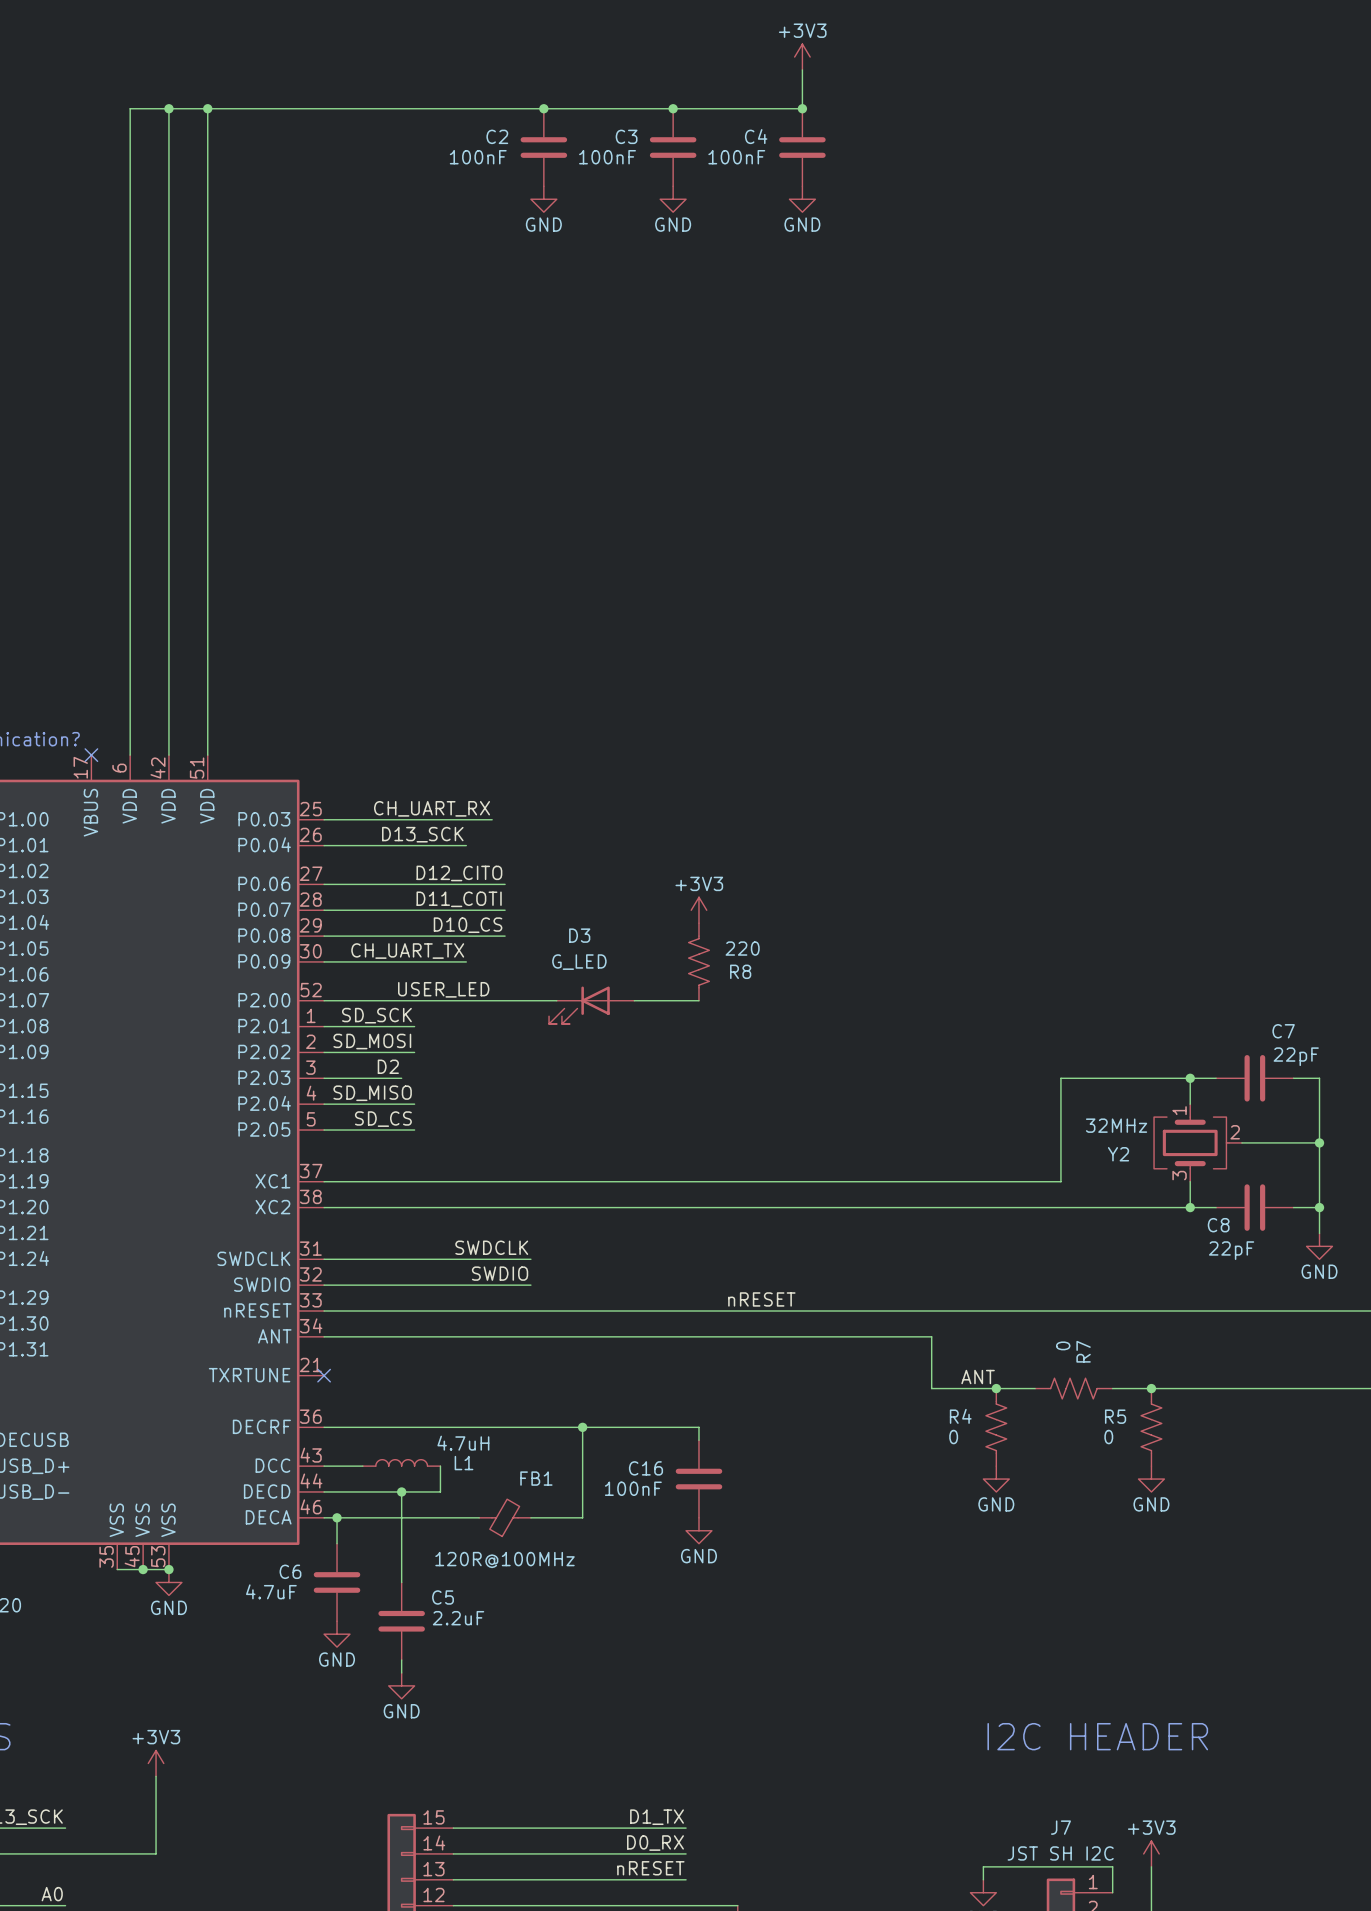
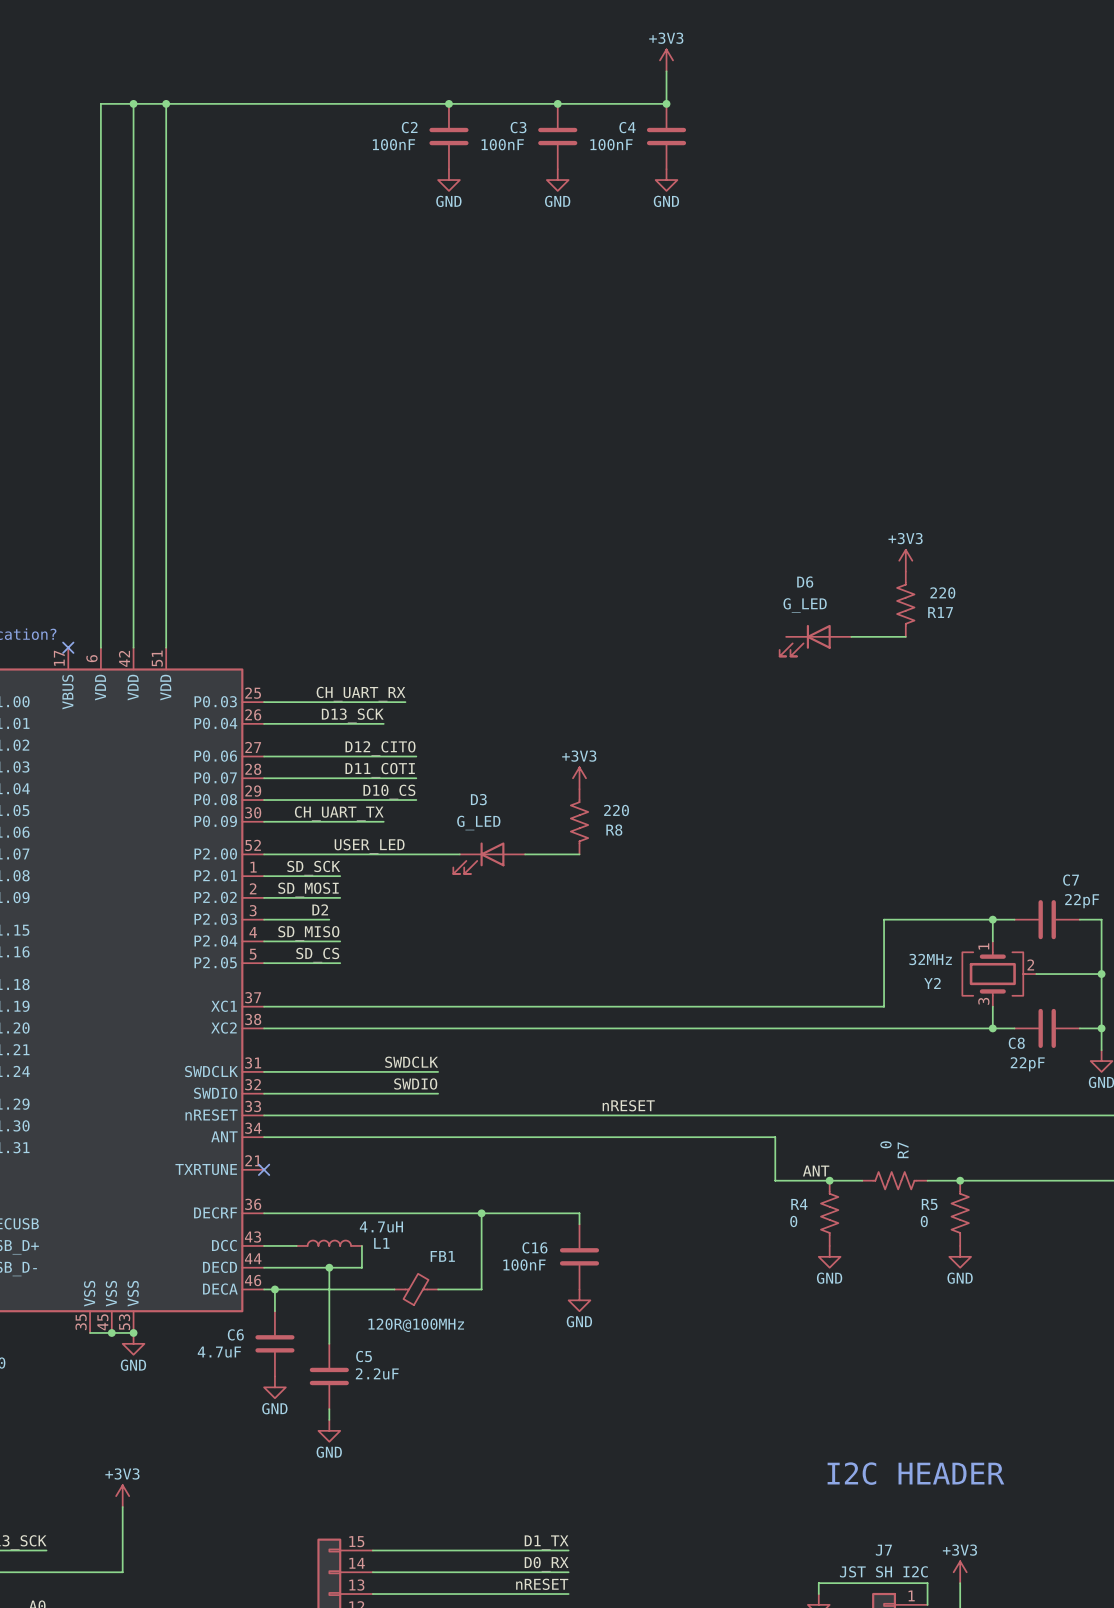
power symbol: none -> +3V3 (905, 560)
R17: none -> 220 (905, 604)
wire: none -> (851, 636) (905, 636)
D6: none -> G_LED (815, 640)

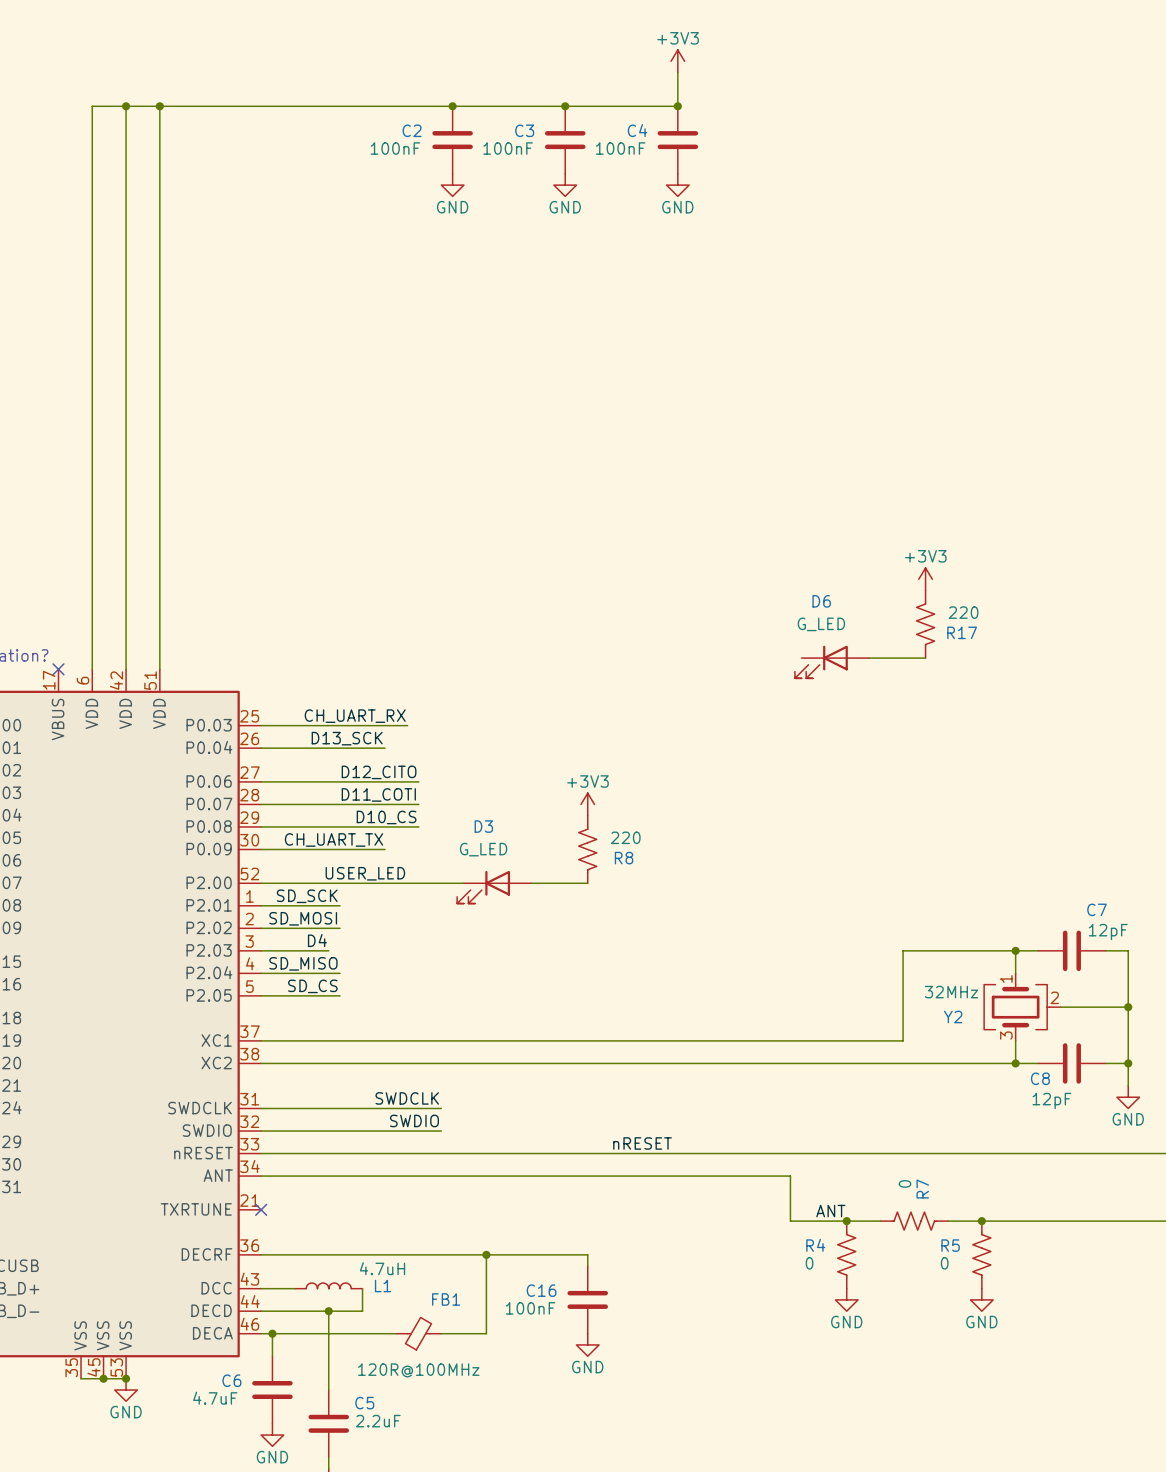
C7 value: 22pF (1082, 901) -> 12pF (1108, 932)
label: D2 (320, 909) -> D4 (317, 940)
C8 value: 22pF (1027, 1064) -> 12pF (1051, 1100)

